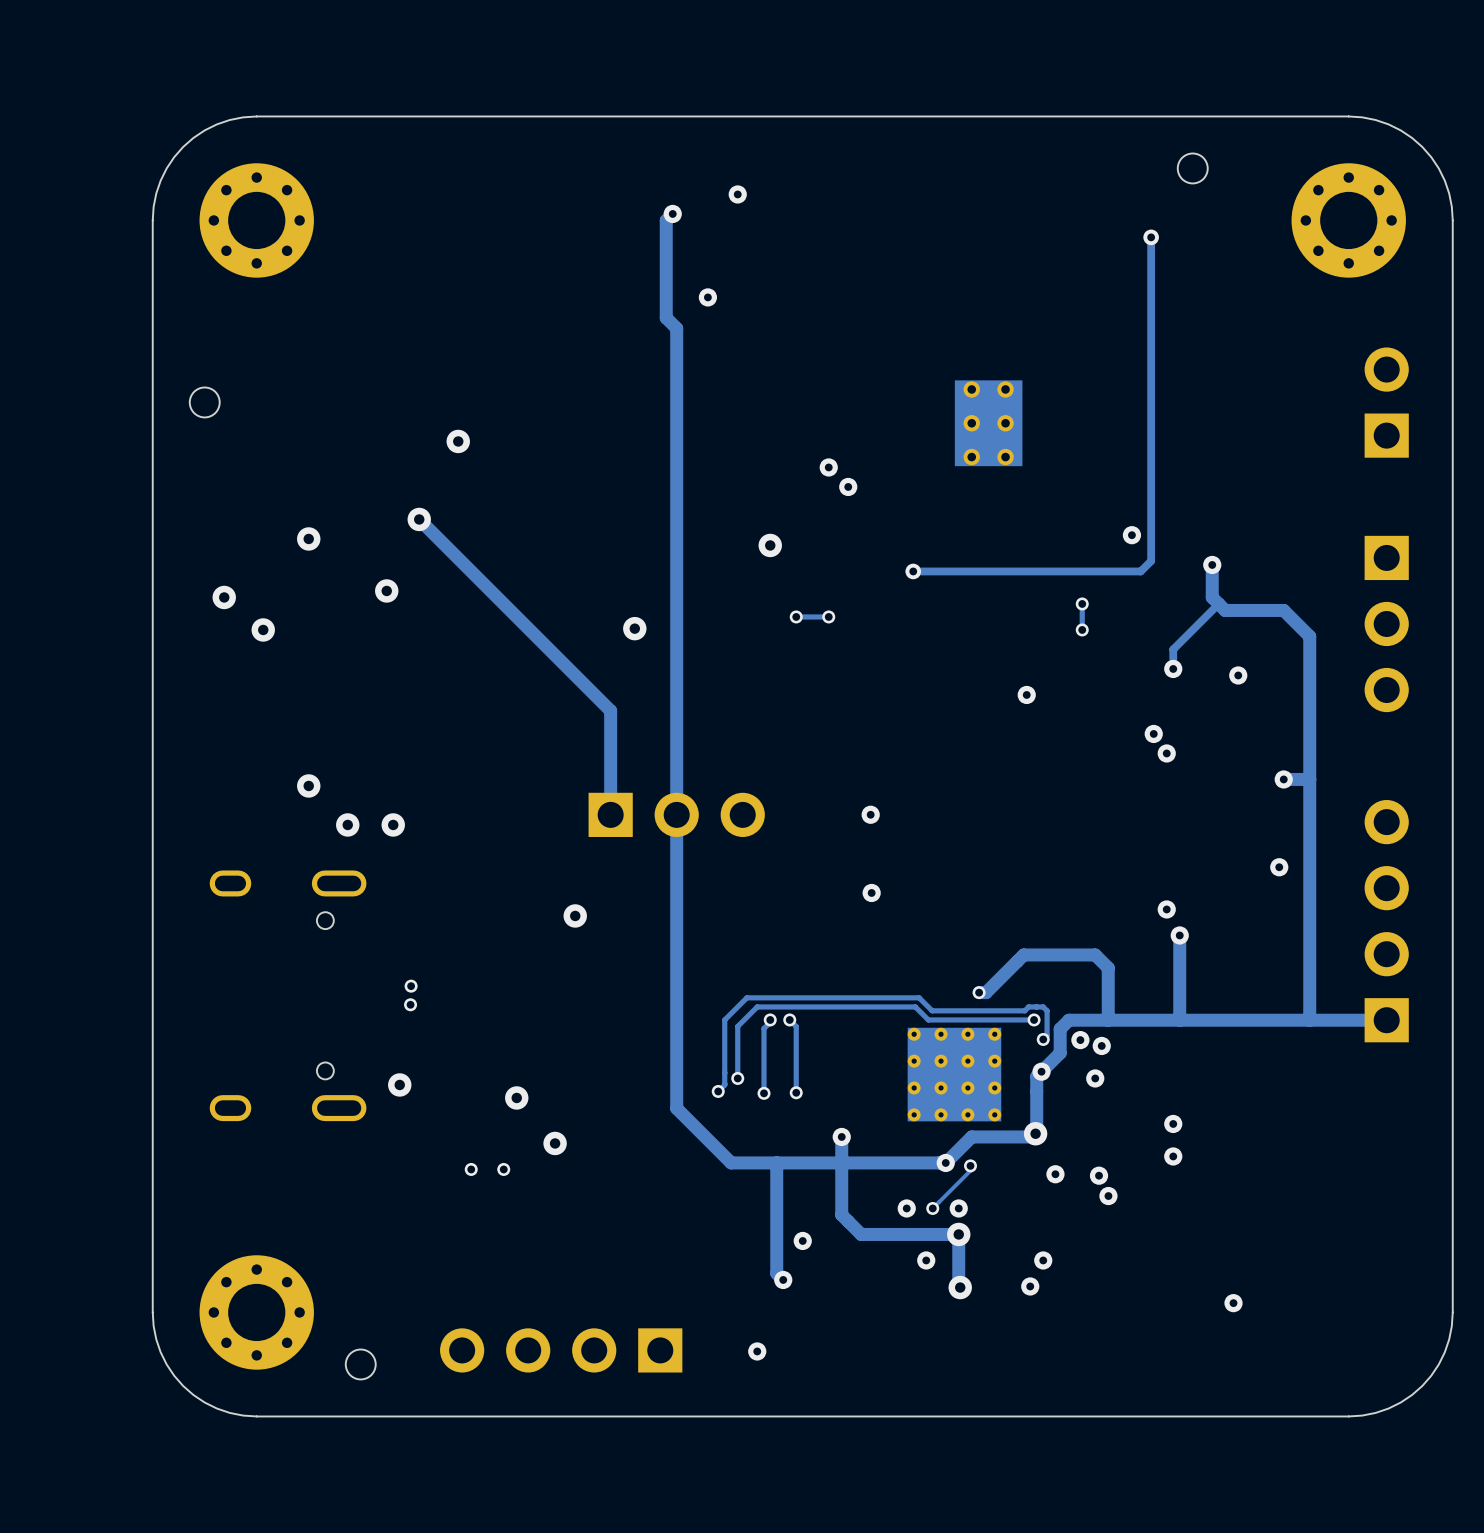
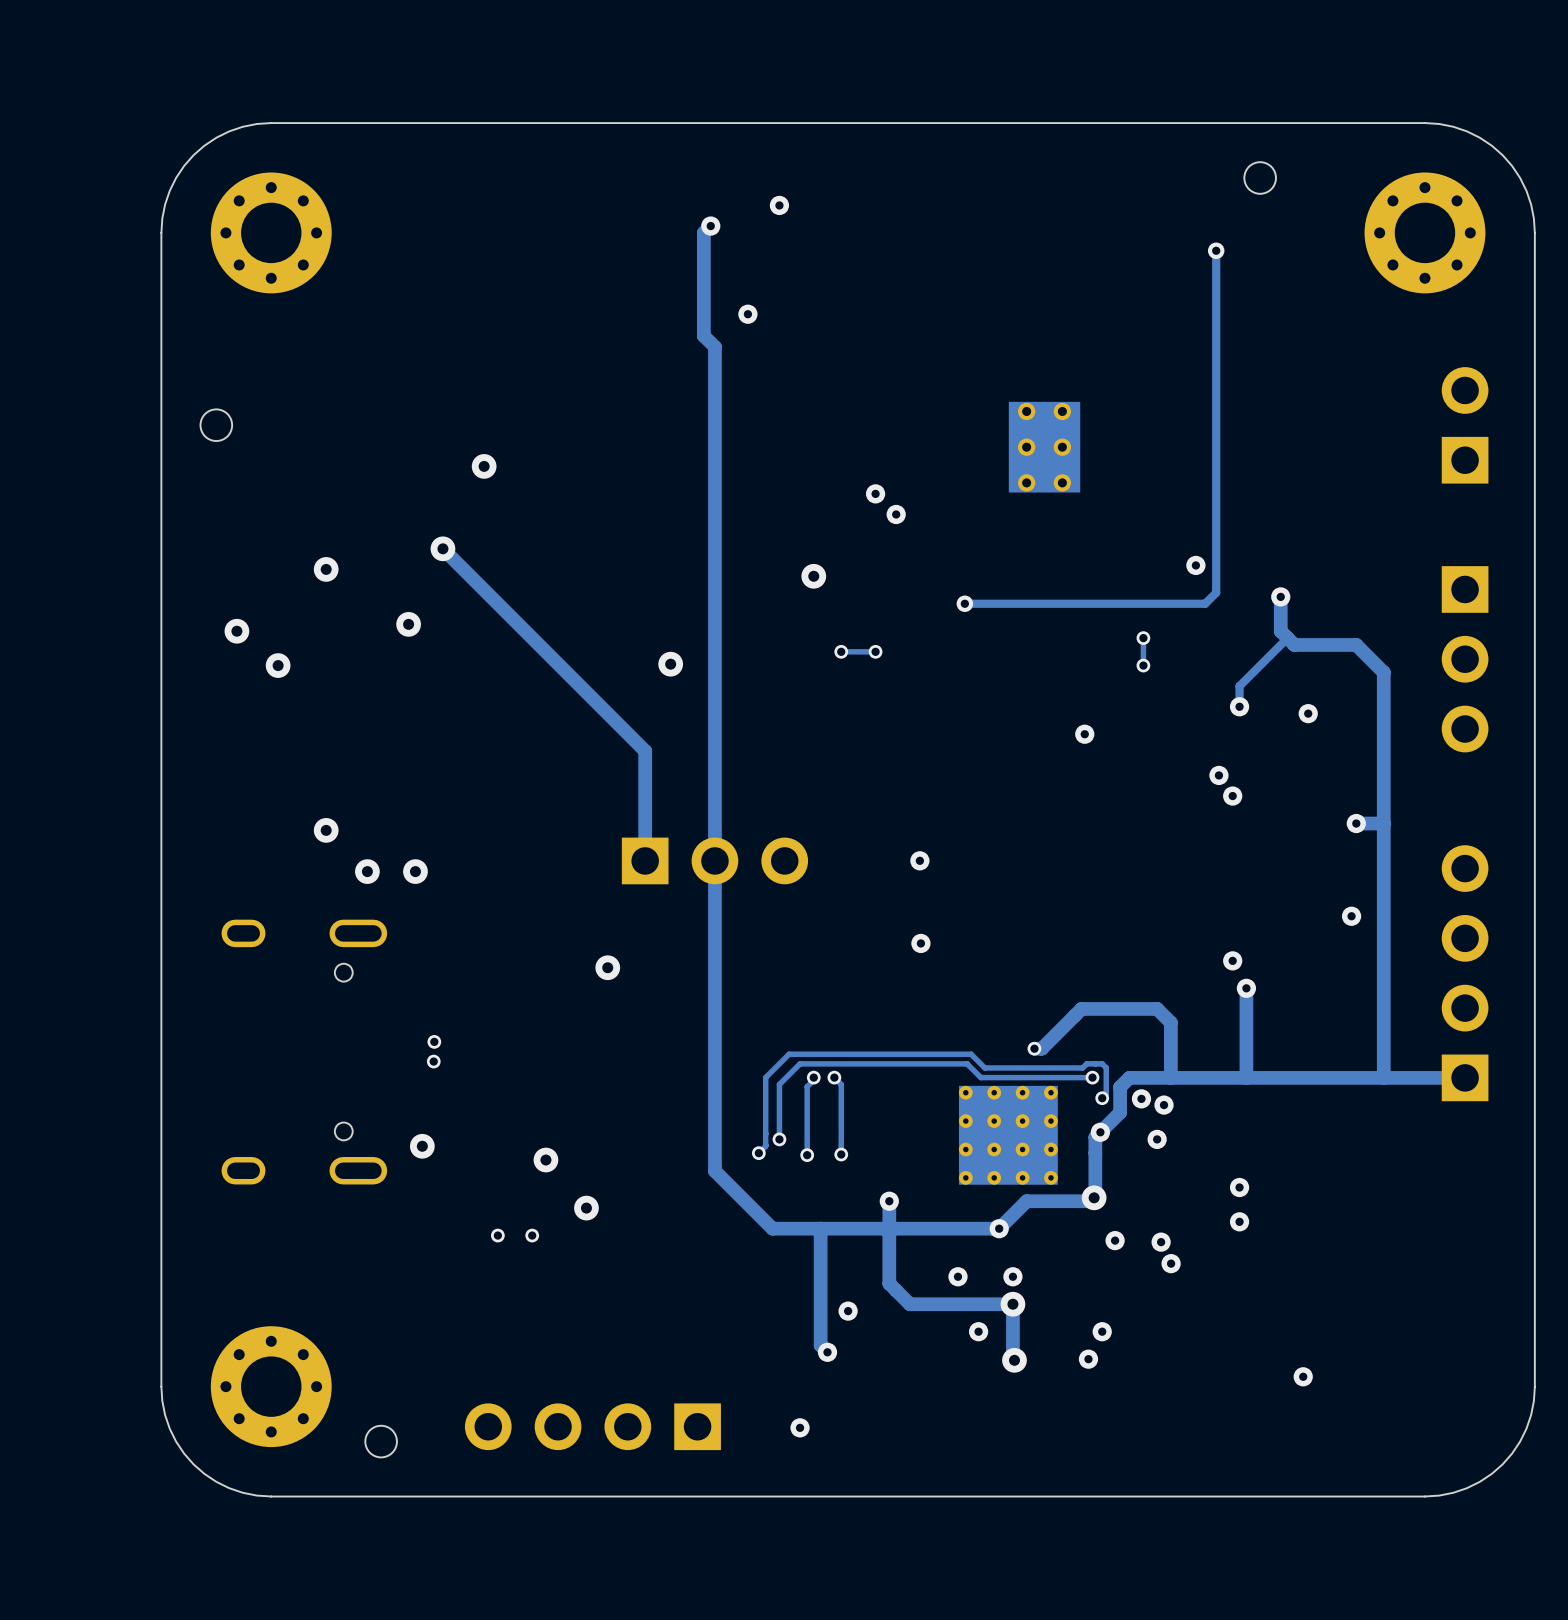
track: (970, 1165) (970, 1170) (932, 1208) -> none
via: (970, 1165) -> none
via: (932, 1208) -> none

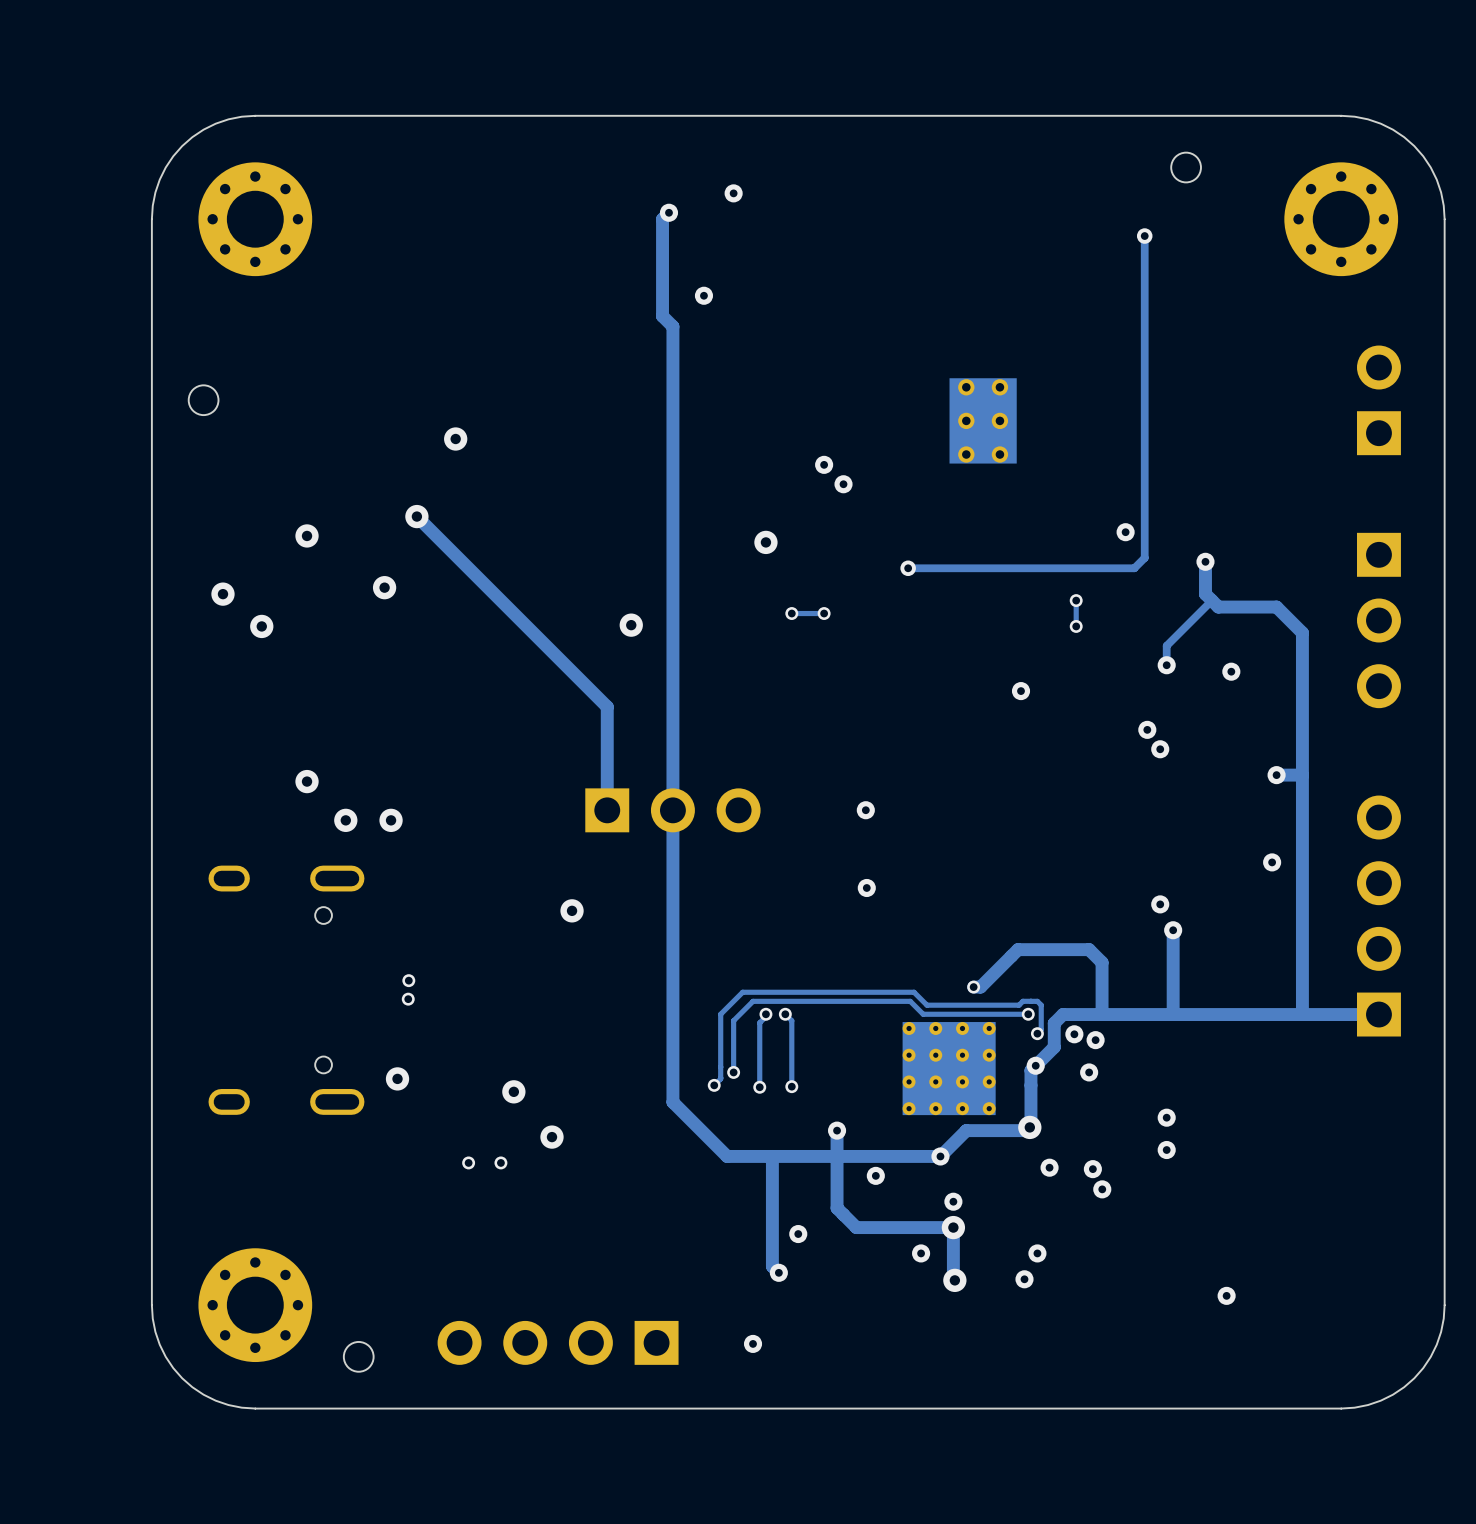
via position: (957, 1276) -> (875, 1175)

